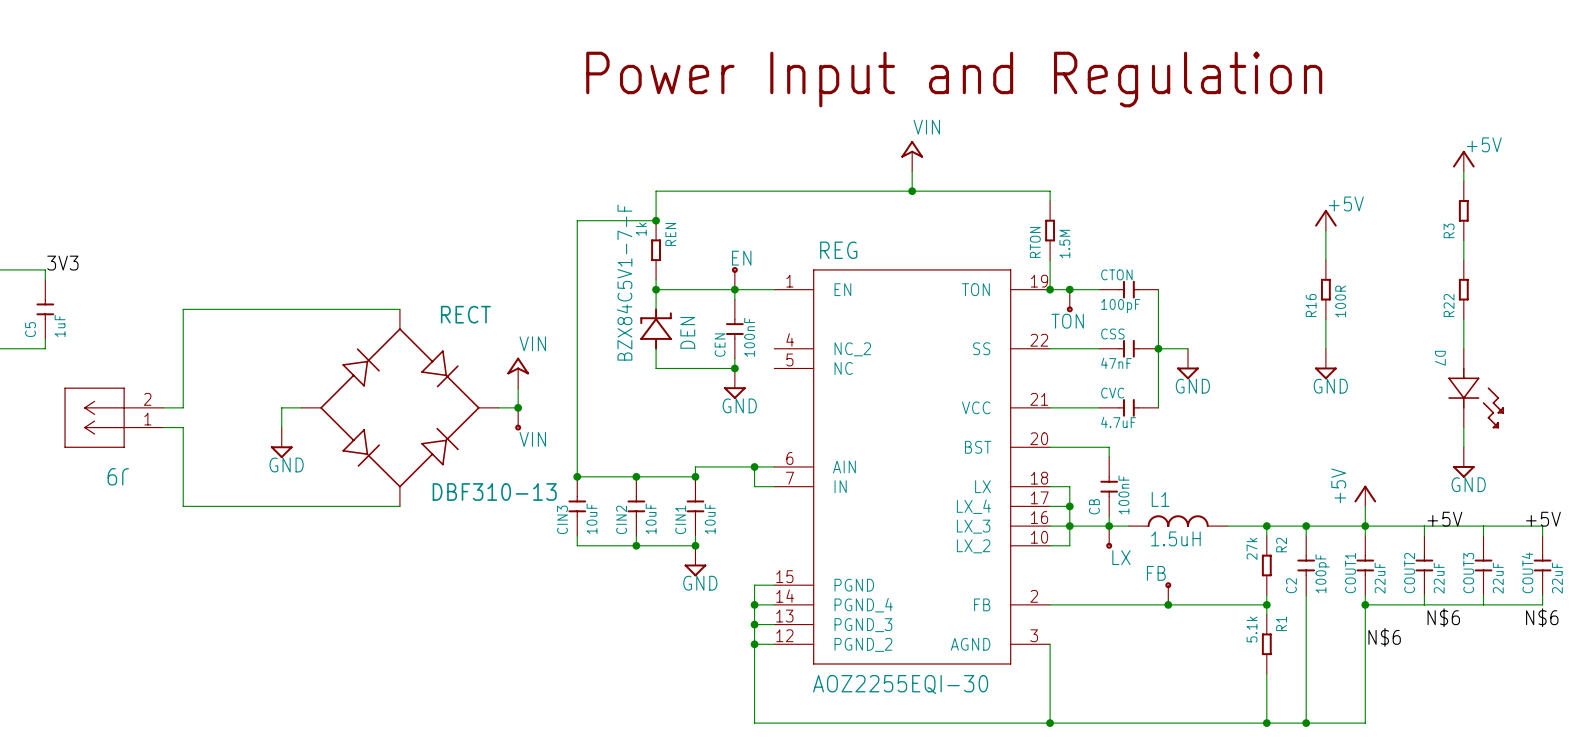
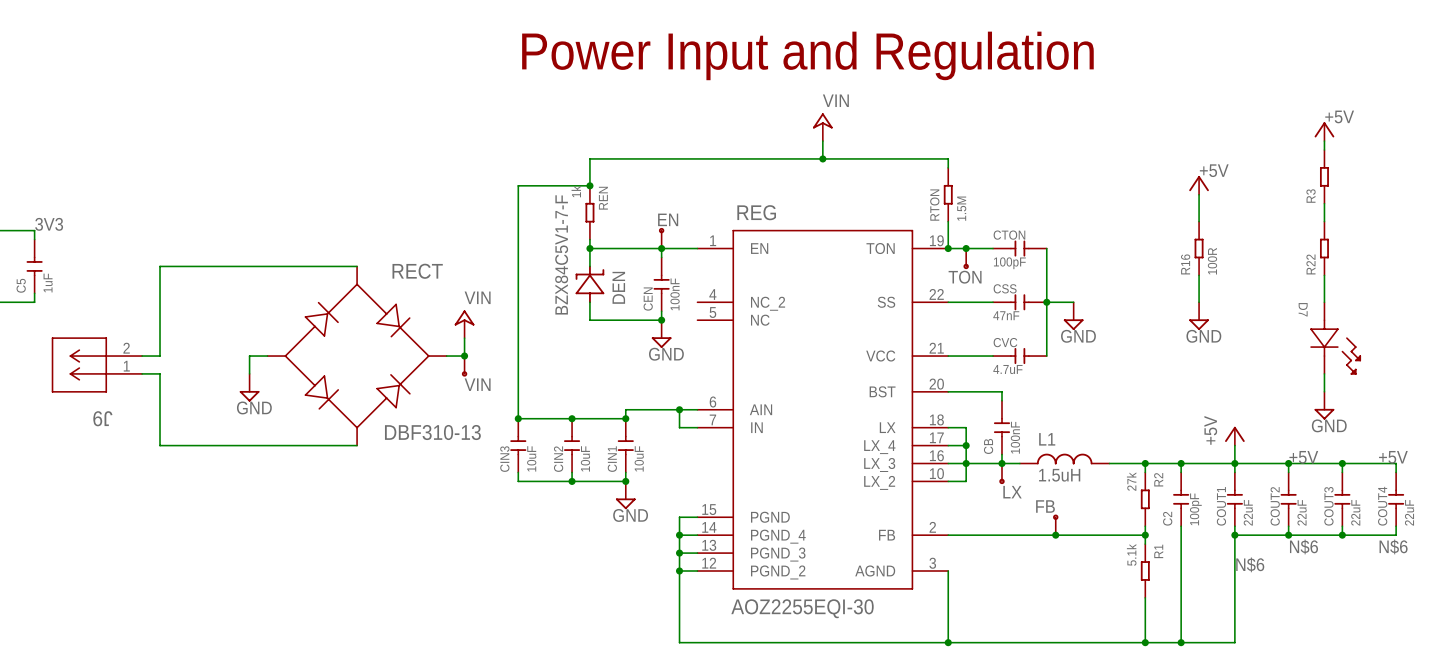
junction: none -> (1288, 463)
junction: none -> (1342, 463)
junction: none -> (1288, 535)
junction: none -> (1342, 535)

